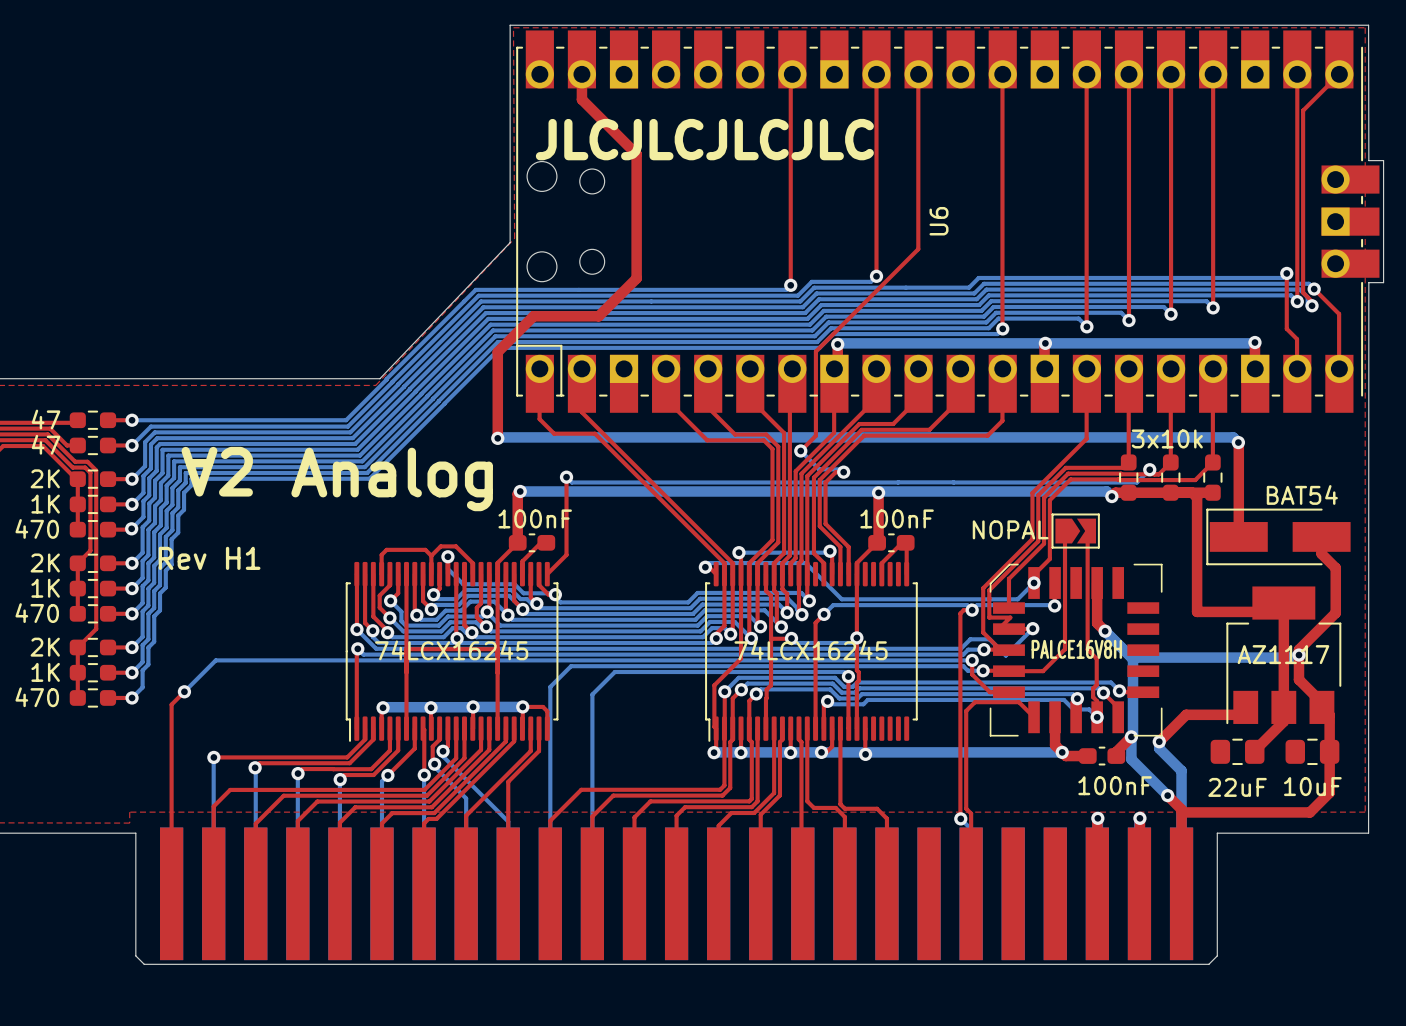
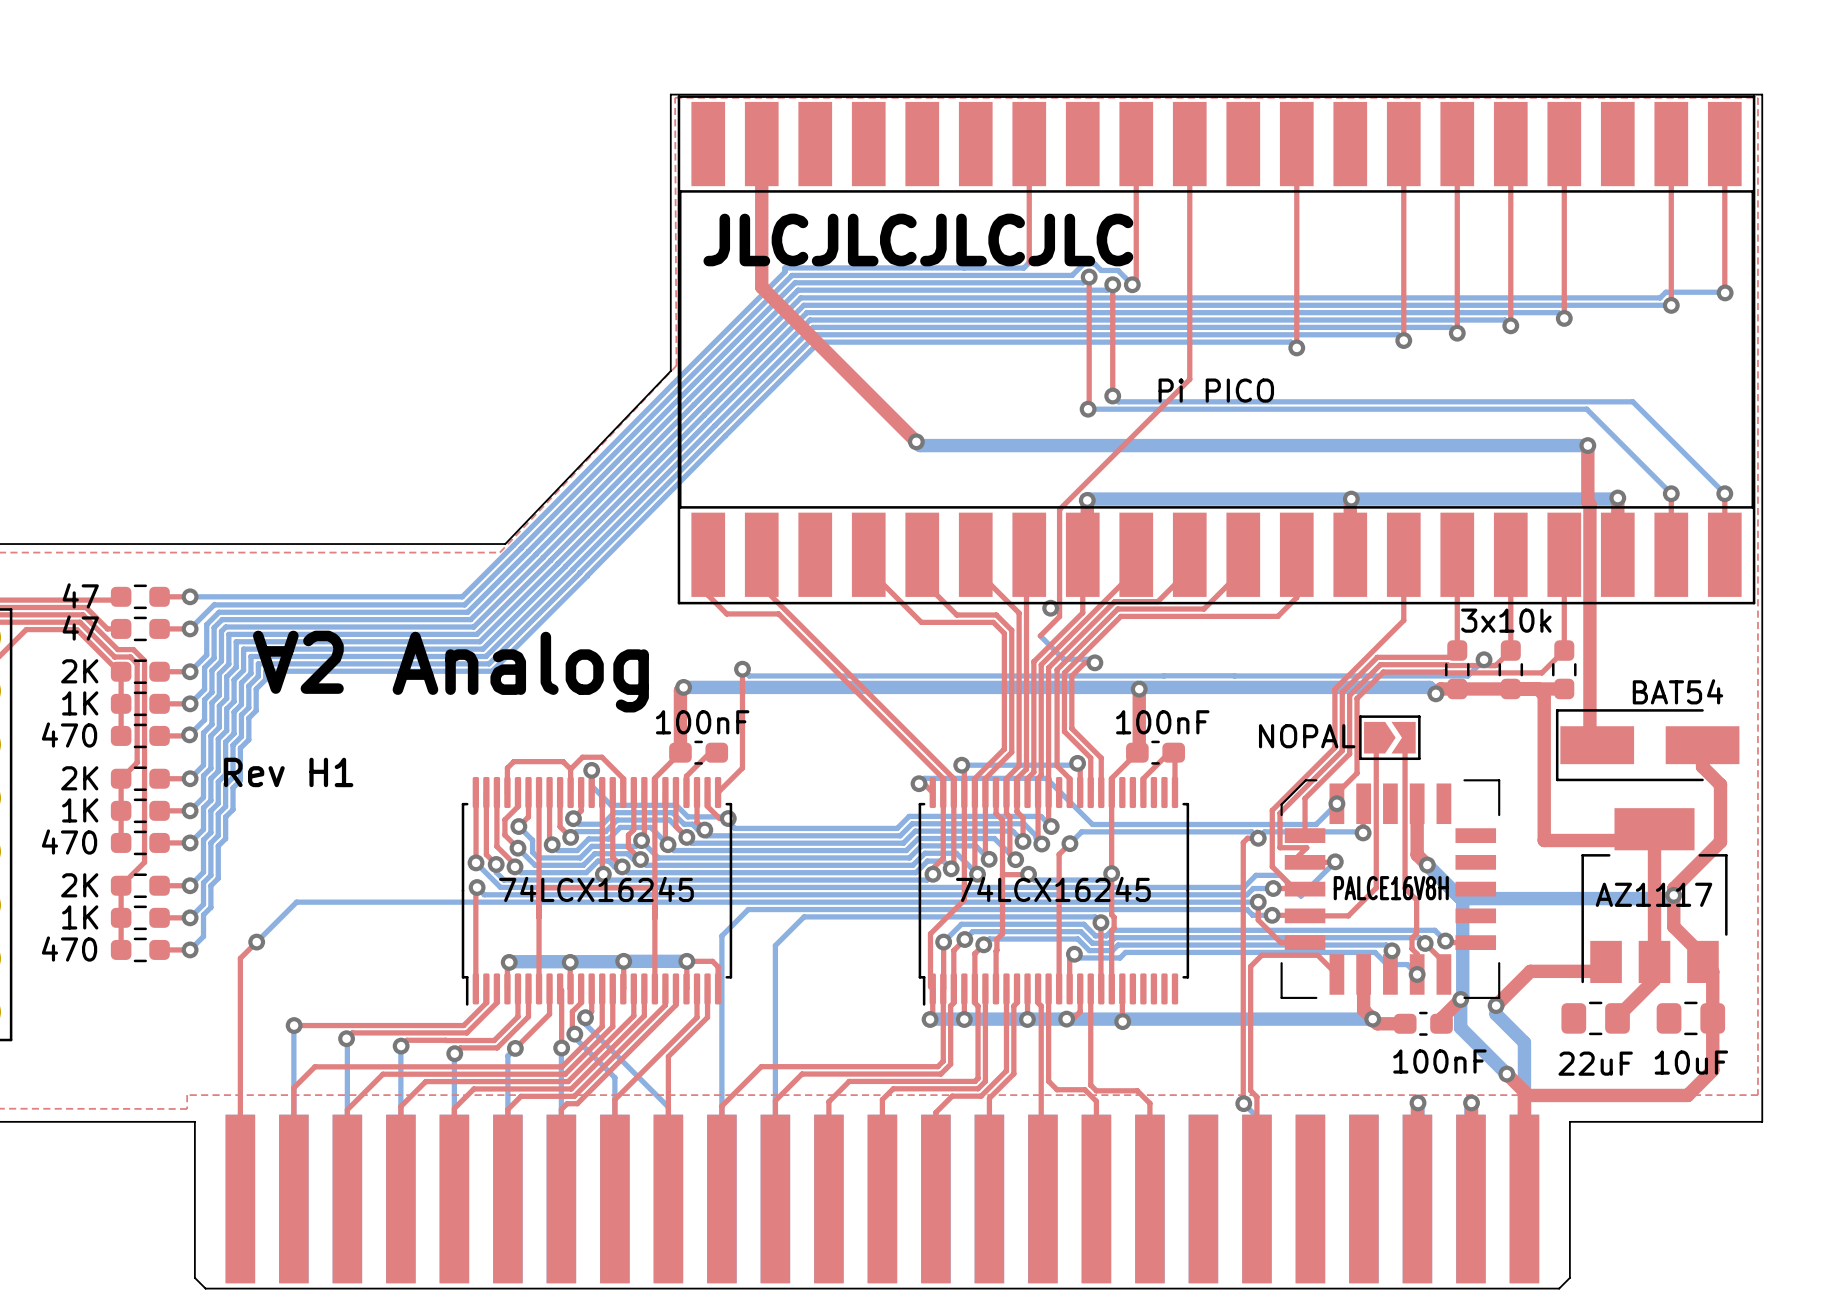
board edge: (1368, 25) (1368, 160) (1383, 160) (1383, 282) (1368, 282) (1368, 833) -> (1762, 94) (1762, 1121)
top track: none -> (761, 144) (761, 287) (916, 441)
top track: none -> (1029, 144) (1029, 262)
top track: none -> (1136, 144) (1136, 280) (1132, 284)
top track: none -> (1457, 144) (1457, 333)
top track: none -> (1510, 144) (1510, 325)
top track: none -> (1564, 144) (1564, 318)
top track: none -> (1671, 144) (1671, 305)
top track: none -> (1724, 144) (1725, 292)
top track: (581, 74) (581, 99) (636, 154) (636, 278) (598, 316) (533, 316) (497, 352) (497, 438) -> none
top track: (792, 74) (790, 75) (790, 285) -> none
top track: (876, 74) (876, 276) -> none
top track: (1128, 74) (1128, 320) -> none
top track: (1171, 74) (1171, 314) -> none
top track: (1213, 74) (1213, 307) -> none
top track: (1297, 74) (1297, 301) -> none
top track: (1339, 74) (1303, 110) (1303, 292) (1312, 301) (1312, 305) -> none
top track: none -> (1089, 277) (1088, 409)
via: none -> (1089, 277)
top track: none -> (1112, 284) (1112, 396)
via: none -> (1112, 284)
via: none -> (1132, 284)
via: none -> (1725, 292)
via: none -> (1671, 305)
via: none -> (1564, 318)
via: none -> (1510, 325)
via: none -> (1457, 333)
top track: (1086, 218) (1086, 326) -> none
via: none -> (1403, 340)
U6: (947, 221) -> none
top track: (1002, 224) (1002, 328) -> none
via: none -> (1296, 347)
part: none -> Pi PICO (1216, 349)
bottom track: none -> (1112, 396) (1118, 401) (1632, 401) (1724, 493)
via: none -> (1112, 396)
bottom track: none -> (1088, 409) (1586, 409) (1671, 493)
via: none -> (1088, 409)
top track: (1286, 273) (1286, 328) (1297, 339) -> none
bottom track: (1286, 273) (1282, 277) (978, 277) (969, 287) (814, 287) (800, 301) (481, 301) (398, 384) -> (1089, 277) (1083, 282) (795, 282) (528, 551)
via: (1286, 273) -> none
bottom track: (876, 276) (870, 281) (811, 281) (797, 295) (478, 295) (392, 381) -> (1132, 284) (1118, 270) (1101, 270) (1094, 263) (1083, 263) (1072, 275) (791, 275) (521, 548)
via: (876, 276) -> none
bottom track: (790, 285) (786, 289) (475, 289) (386, 379) -> (1029, 262) (1023, 268) (784, 267) (784, 272) (513, 545)
via: (790, 285) -> none
top track: (1314, 289) (1339, 314) (1339, 339) -> none
bottom track: (1314, 289) (1308, 283) (984, 283) (974, 293) (816, 293) (802, 307) (483, 307) (404, 386) -> (1112, 284) (1107, 290) (798, 290) (535, 554)
via: (1314, 289) -> none
bottom track: none -> (916, 441) (920, 445) (1587, 445)
via: none -> (916, 441)
bottom track: (1297, 301) (1291, 295) (988, 295) (979, 305) (821, 305) (807, 318) (488, 318) (415, 391) -> (1671, 305) (803, 305) (550, 560)
via: (1297, 301) -> none
bottom track: (1312, 305) (1312, 301) (1307, 306) (1307, 297) (1299, 289) (986, 289) (976, 299) (819, 299) (805, 313) (485, 313) (409, 389) -> (1725, 292) (1665, 292) (1660, 297) (800, 297) (543, 557)
via: (1312, 305) -> none
bottom track: (1213, 307) (1206, 301) (991, 301) (981, 310) (823, 310) (810, 324) (490, 324) (421, 393) -> (1564, 318) (1558, 312) (806, 312) (558, 563)
via position: (1213, 307) -> (1587, 445)
bottom track: (1171, 314) (1163, 306) (993, 306) (983, 316) (826, 316) (812, 330) (493, 330) (427, 396) -> (1510, 325) (1505, 320) (809, 320) (565, 566)
via: (1171, 314) -> none
bottom track: (1128, 320) (1121, 312) (996, 312) (986, 322) (828, 322) (814, 336) (495, 336) (433, 398) -> (1457, 333) (1451, 327) (813, 327) (572, 569)
via: (1128, 320) -> none
bottom track: (1086, 326) (1078, 318) (998, 318) (988, 328) (831, 328) (817, 342) (497, 342) (438, 401) -> (1403, 340) (1398, 334) (816, 334) (580, 572)
via: (1086, 326) -> none
bottom track: (1002, 328) (997, 334) (833, 334) (819, 347) (500, 347) (444, 403) -> (1296, 347) (1290, 342) (819, 342) (587, 575)
via: (1002, 328) -> none
via: none -> (1671, 493)
via: none -> (1724, 493)
bottom track: (497, 438) (1233, 437) (1238, 442) -> none
via: (497, 438) -> none
top track: (1238, 442) (1238, 536) -> (1587, 445) (1587, 502) (1589, 504) (1589, 737) (1597, 745)
via: (1238, 442) -> none
via position: (800, 450) -> (1050, 608)

